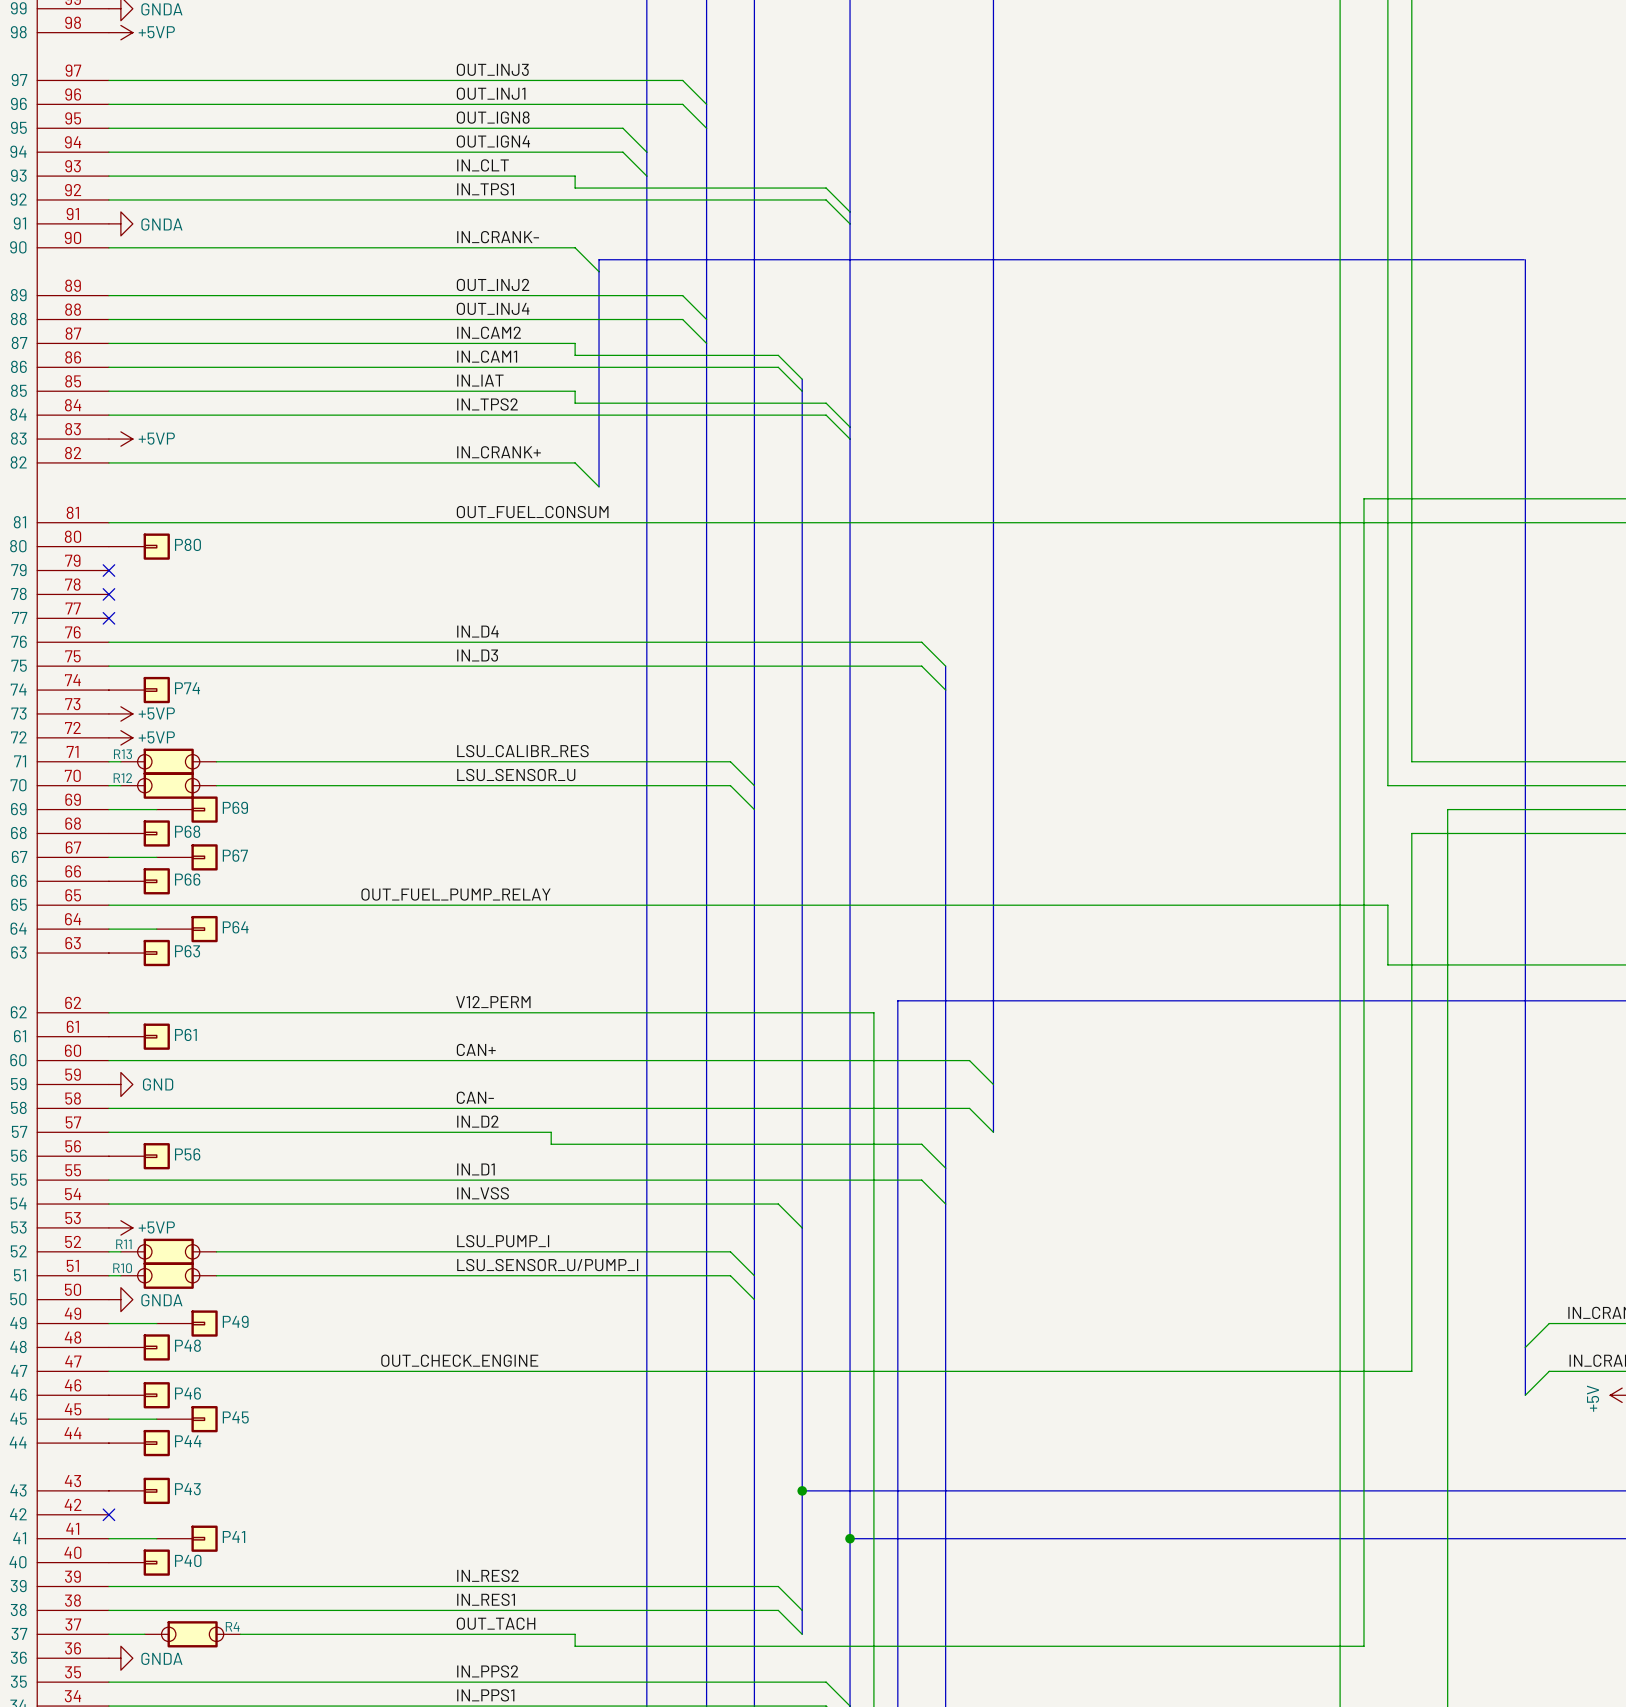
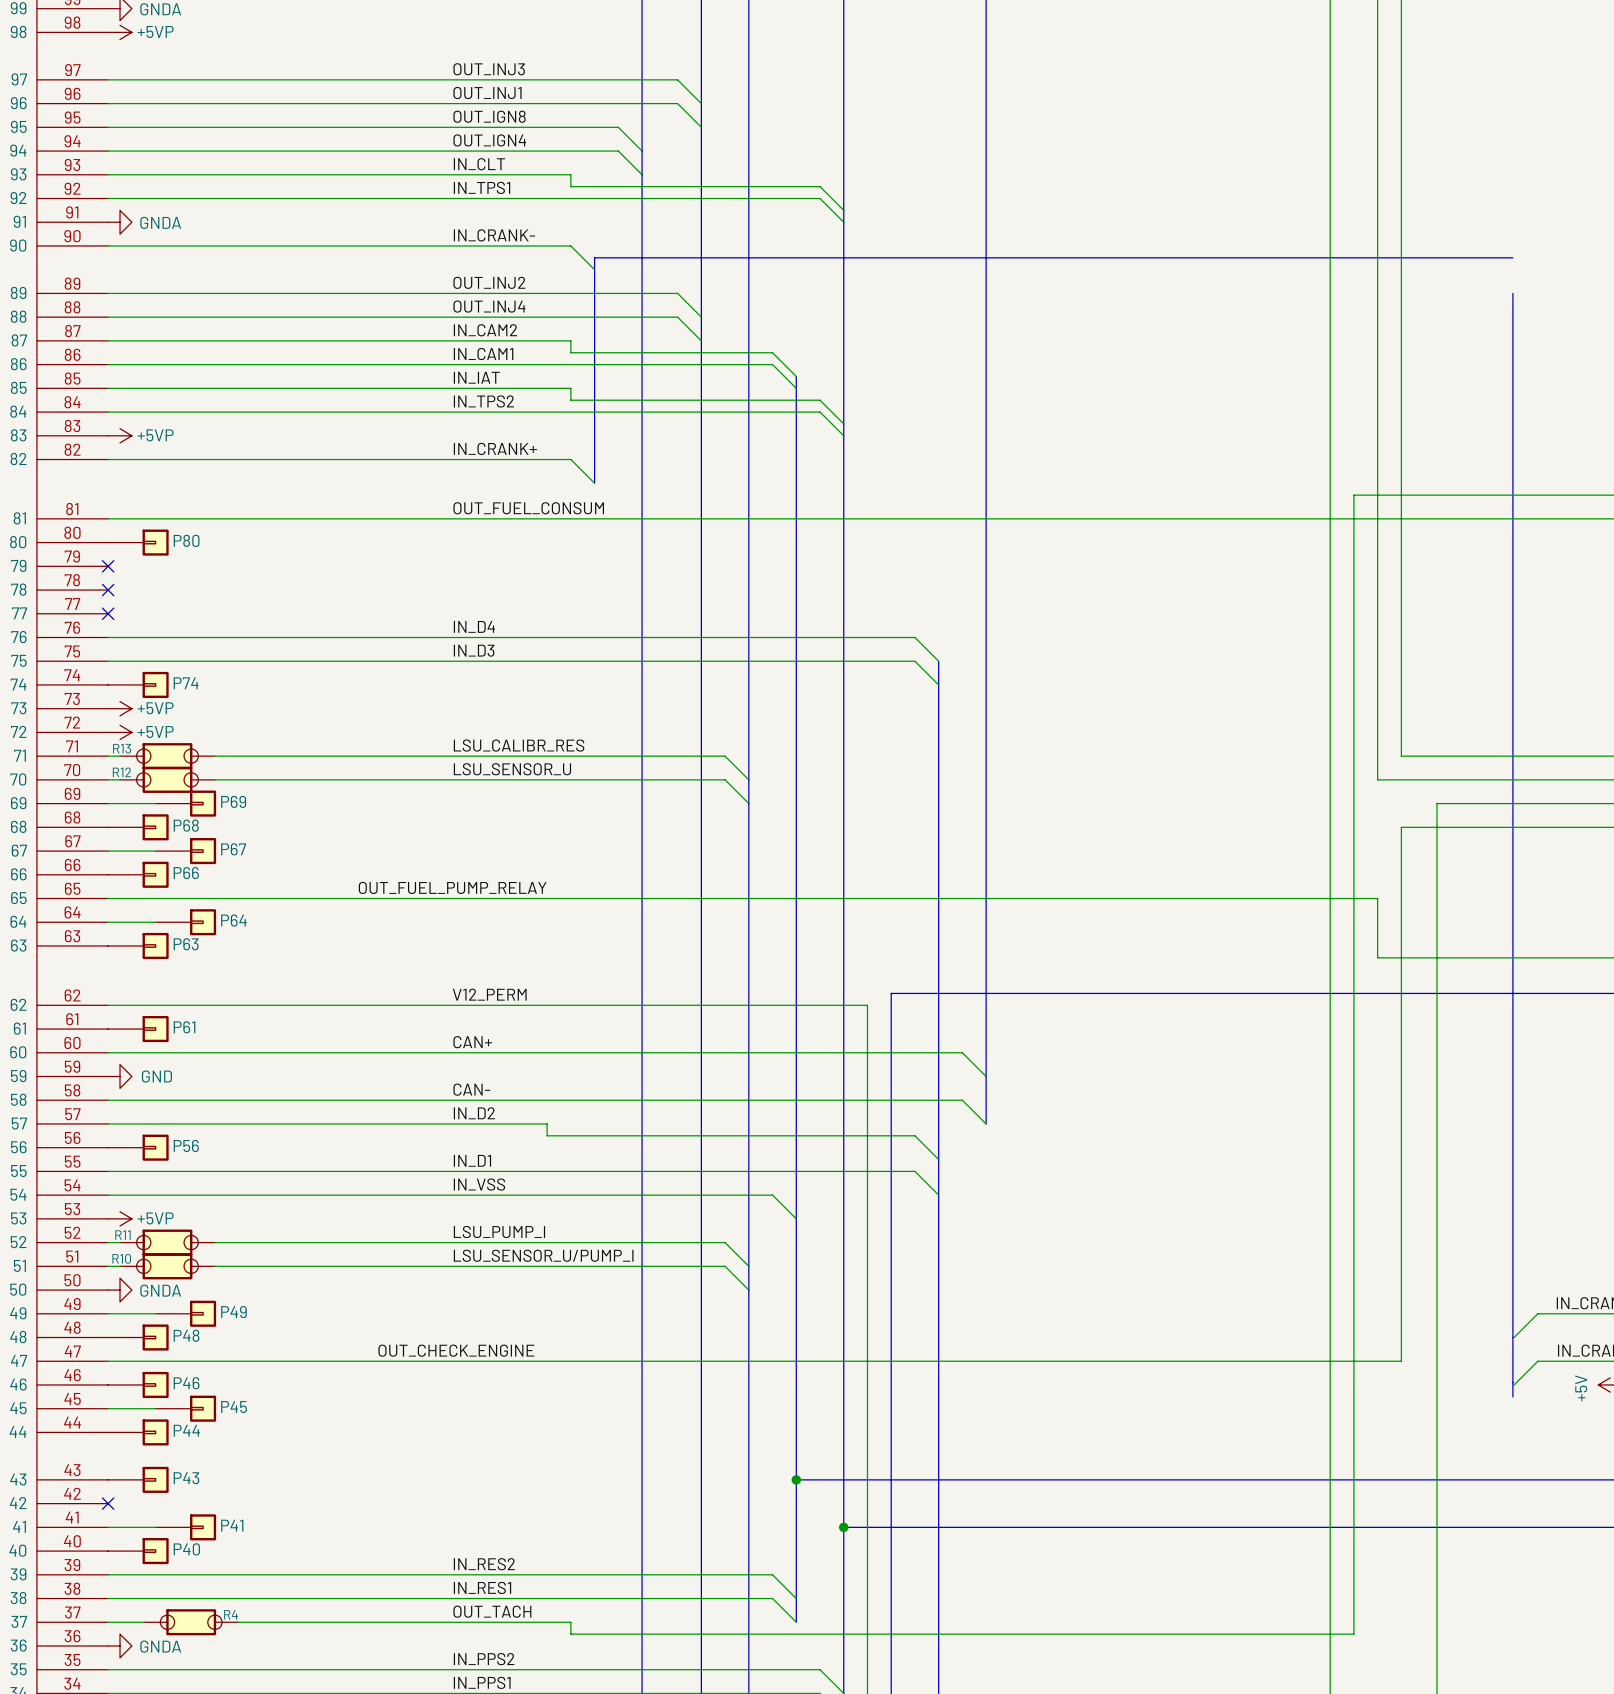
bus: (1525, 259) (1525, 1395) -> none
bus: none -> (1512, 293) (1512, 1396)

